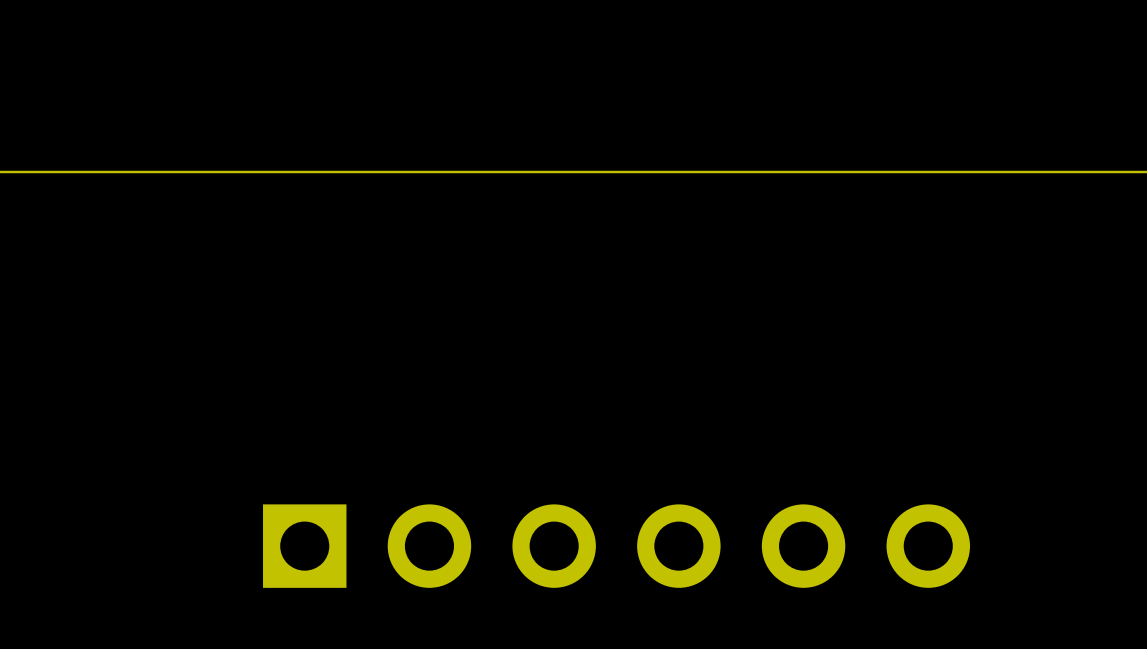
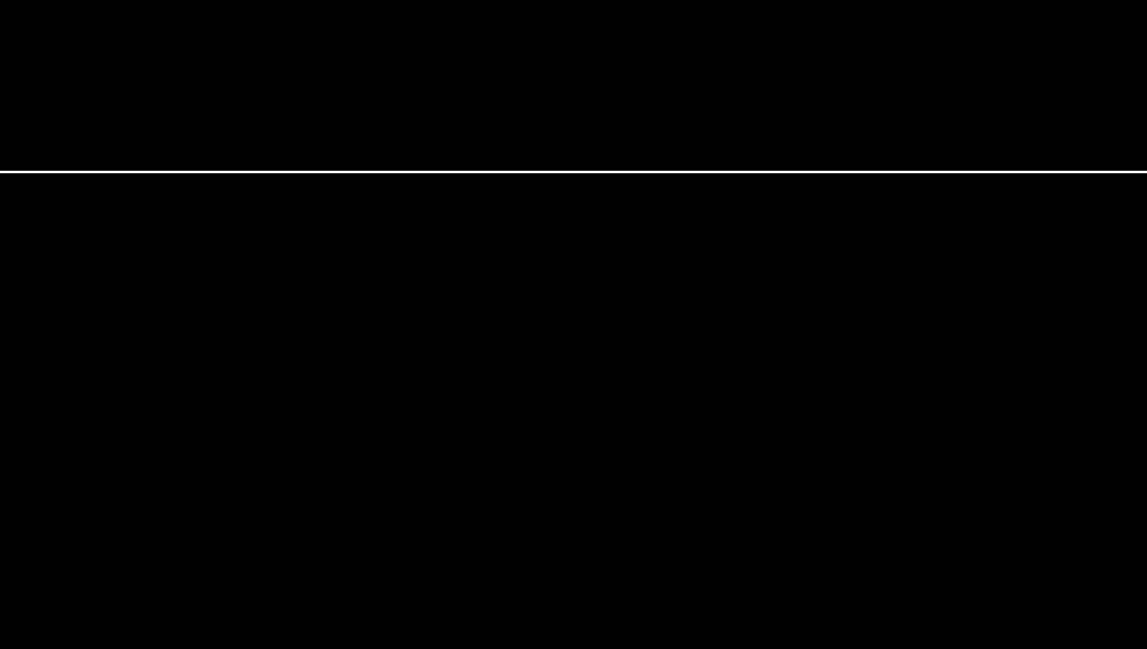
part: (616, 546) -> none

